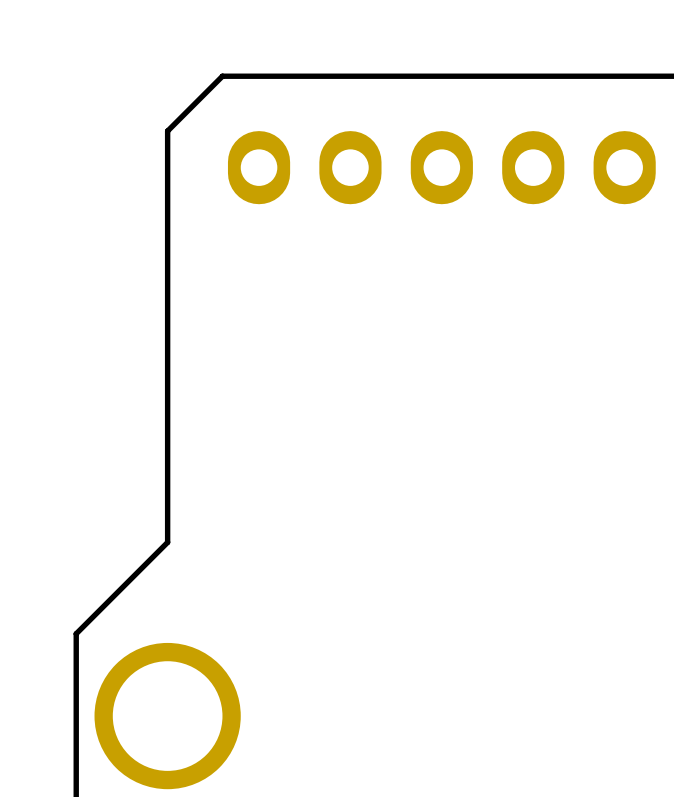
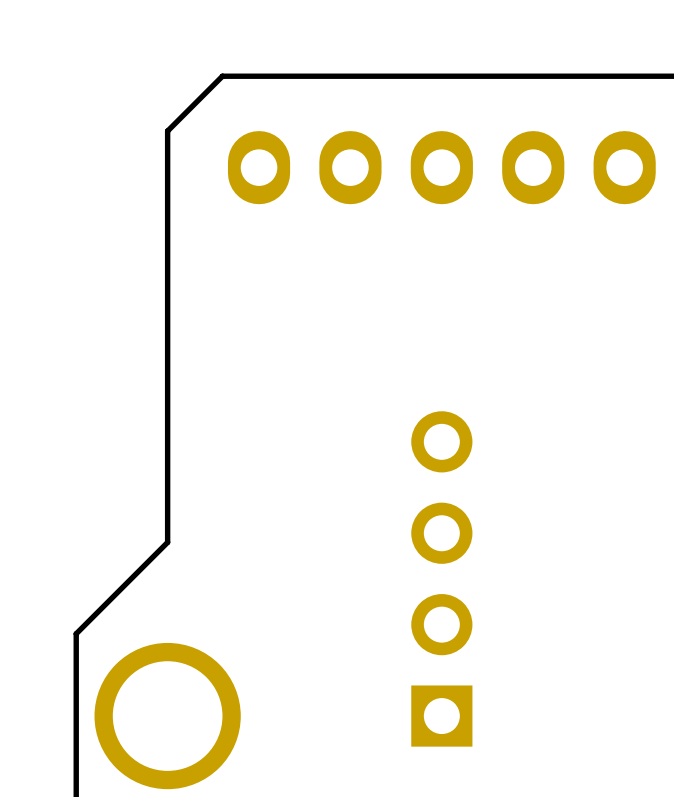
part: none -> (441, 578)

